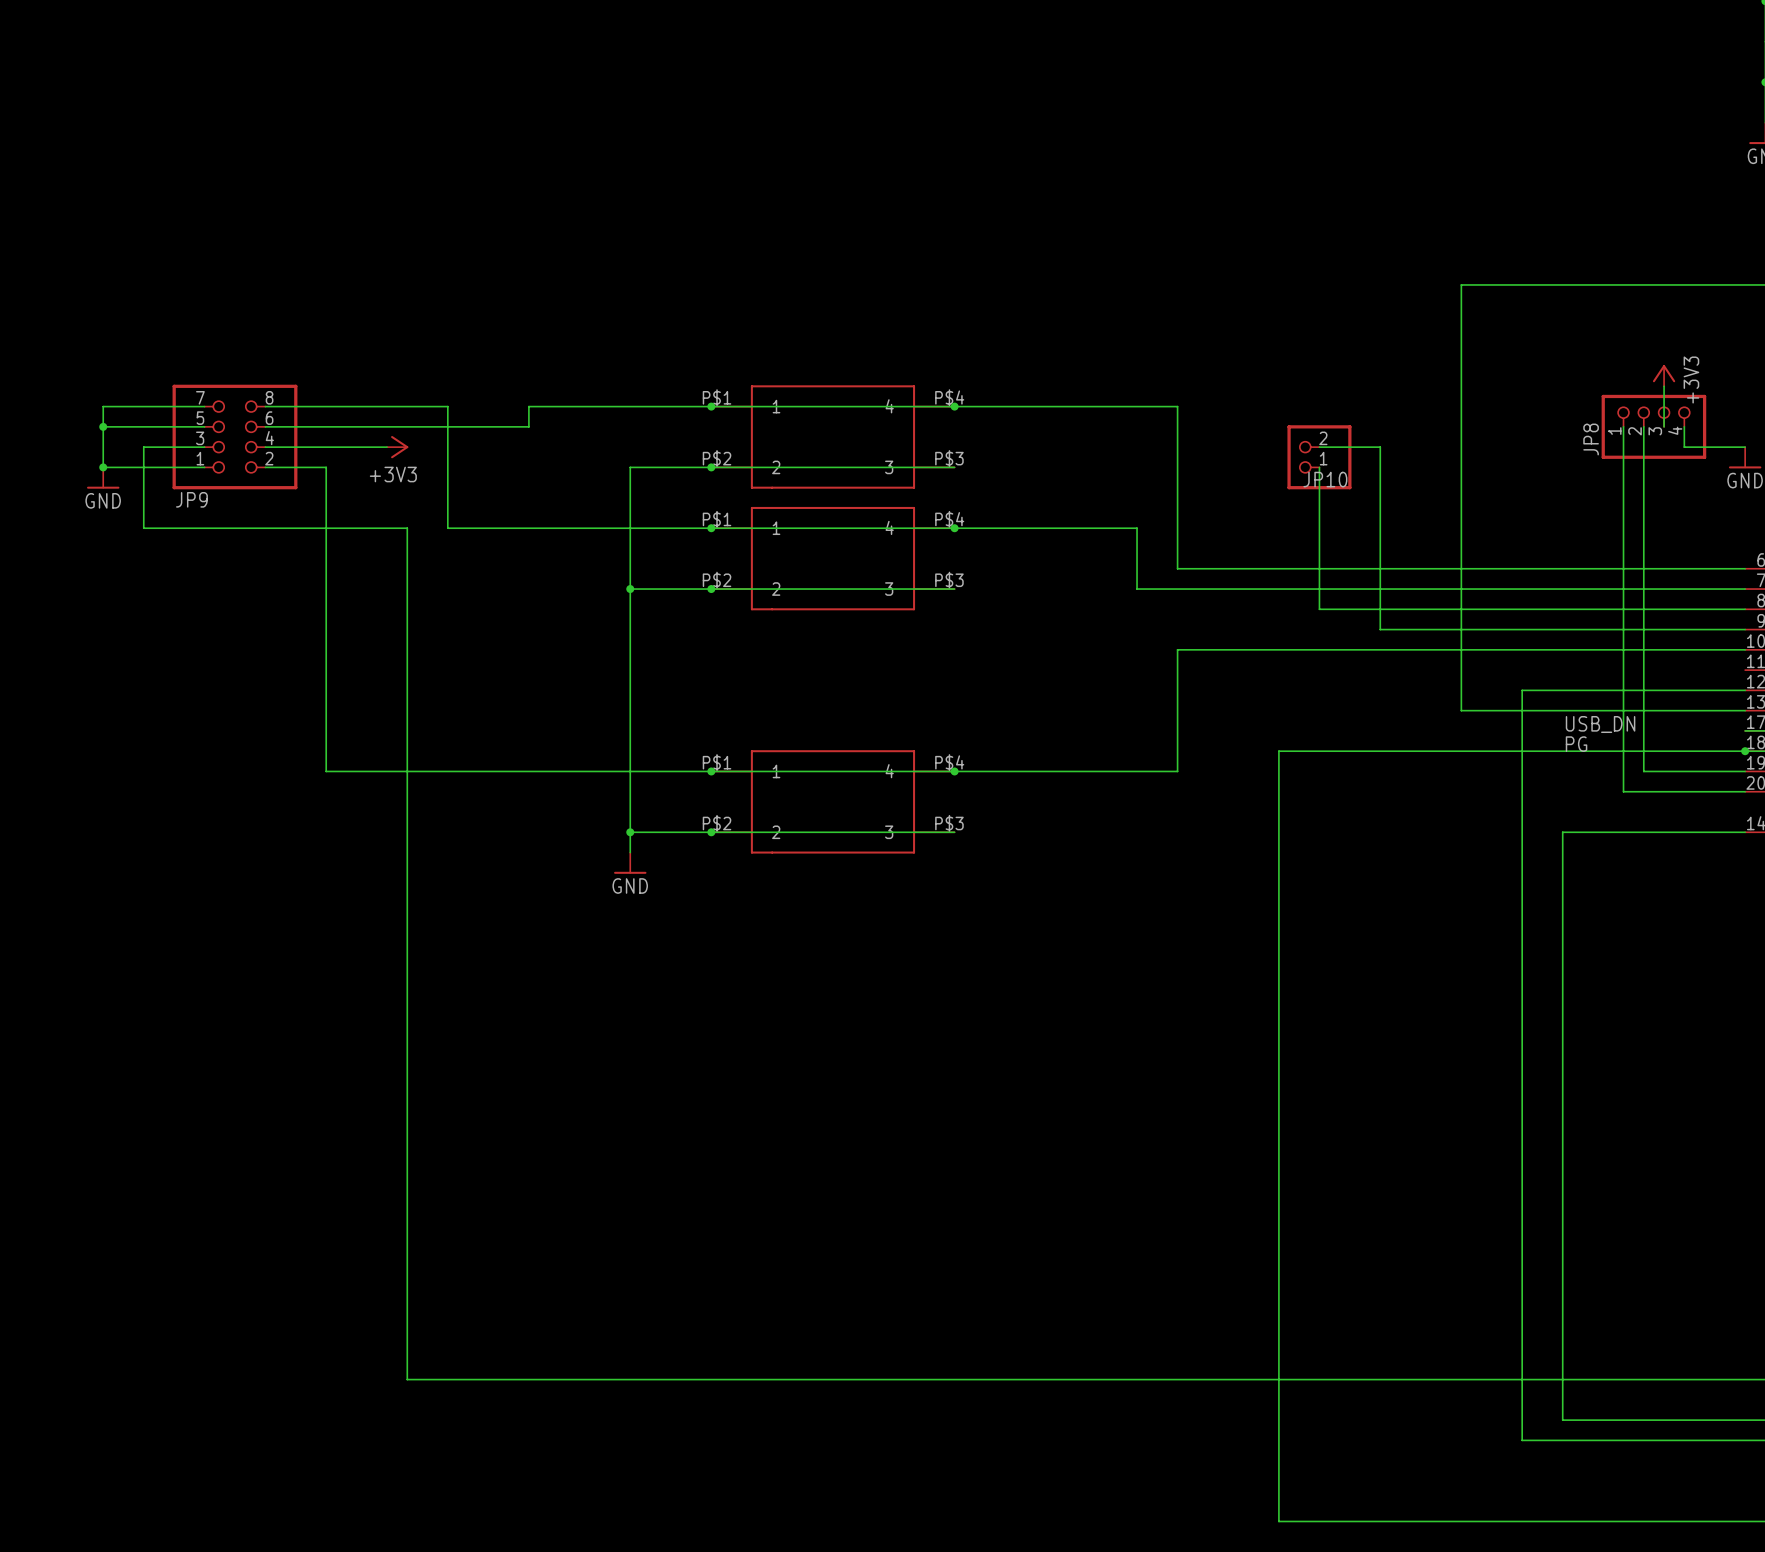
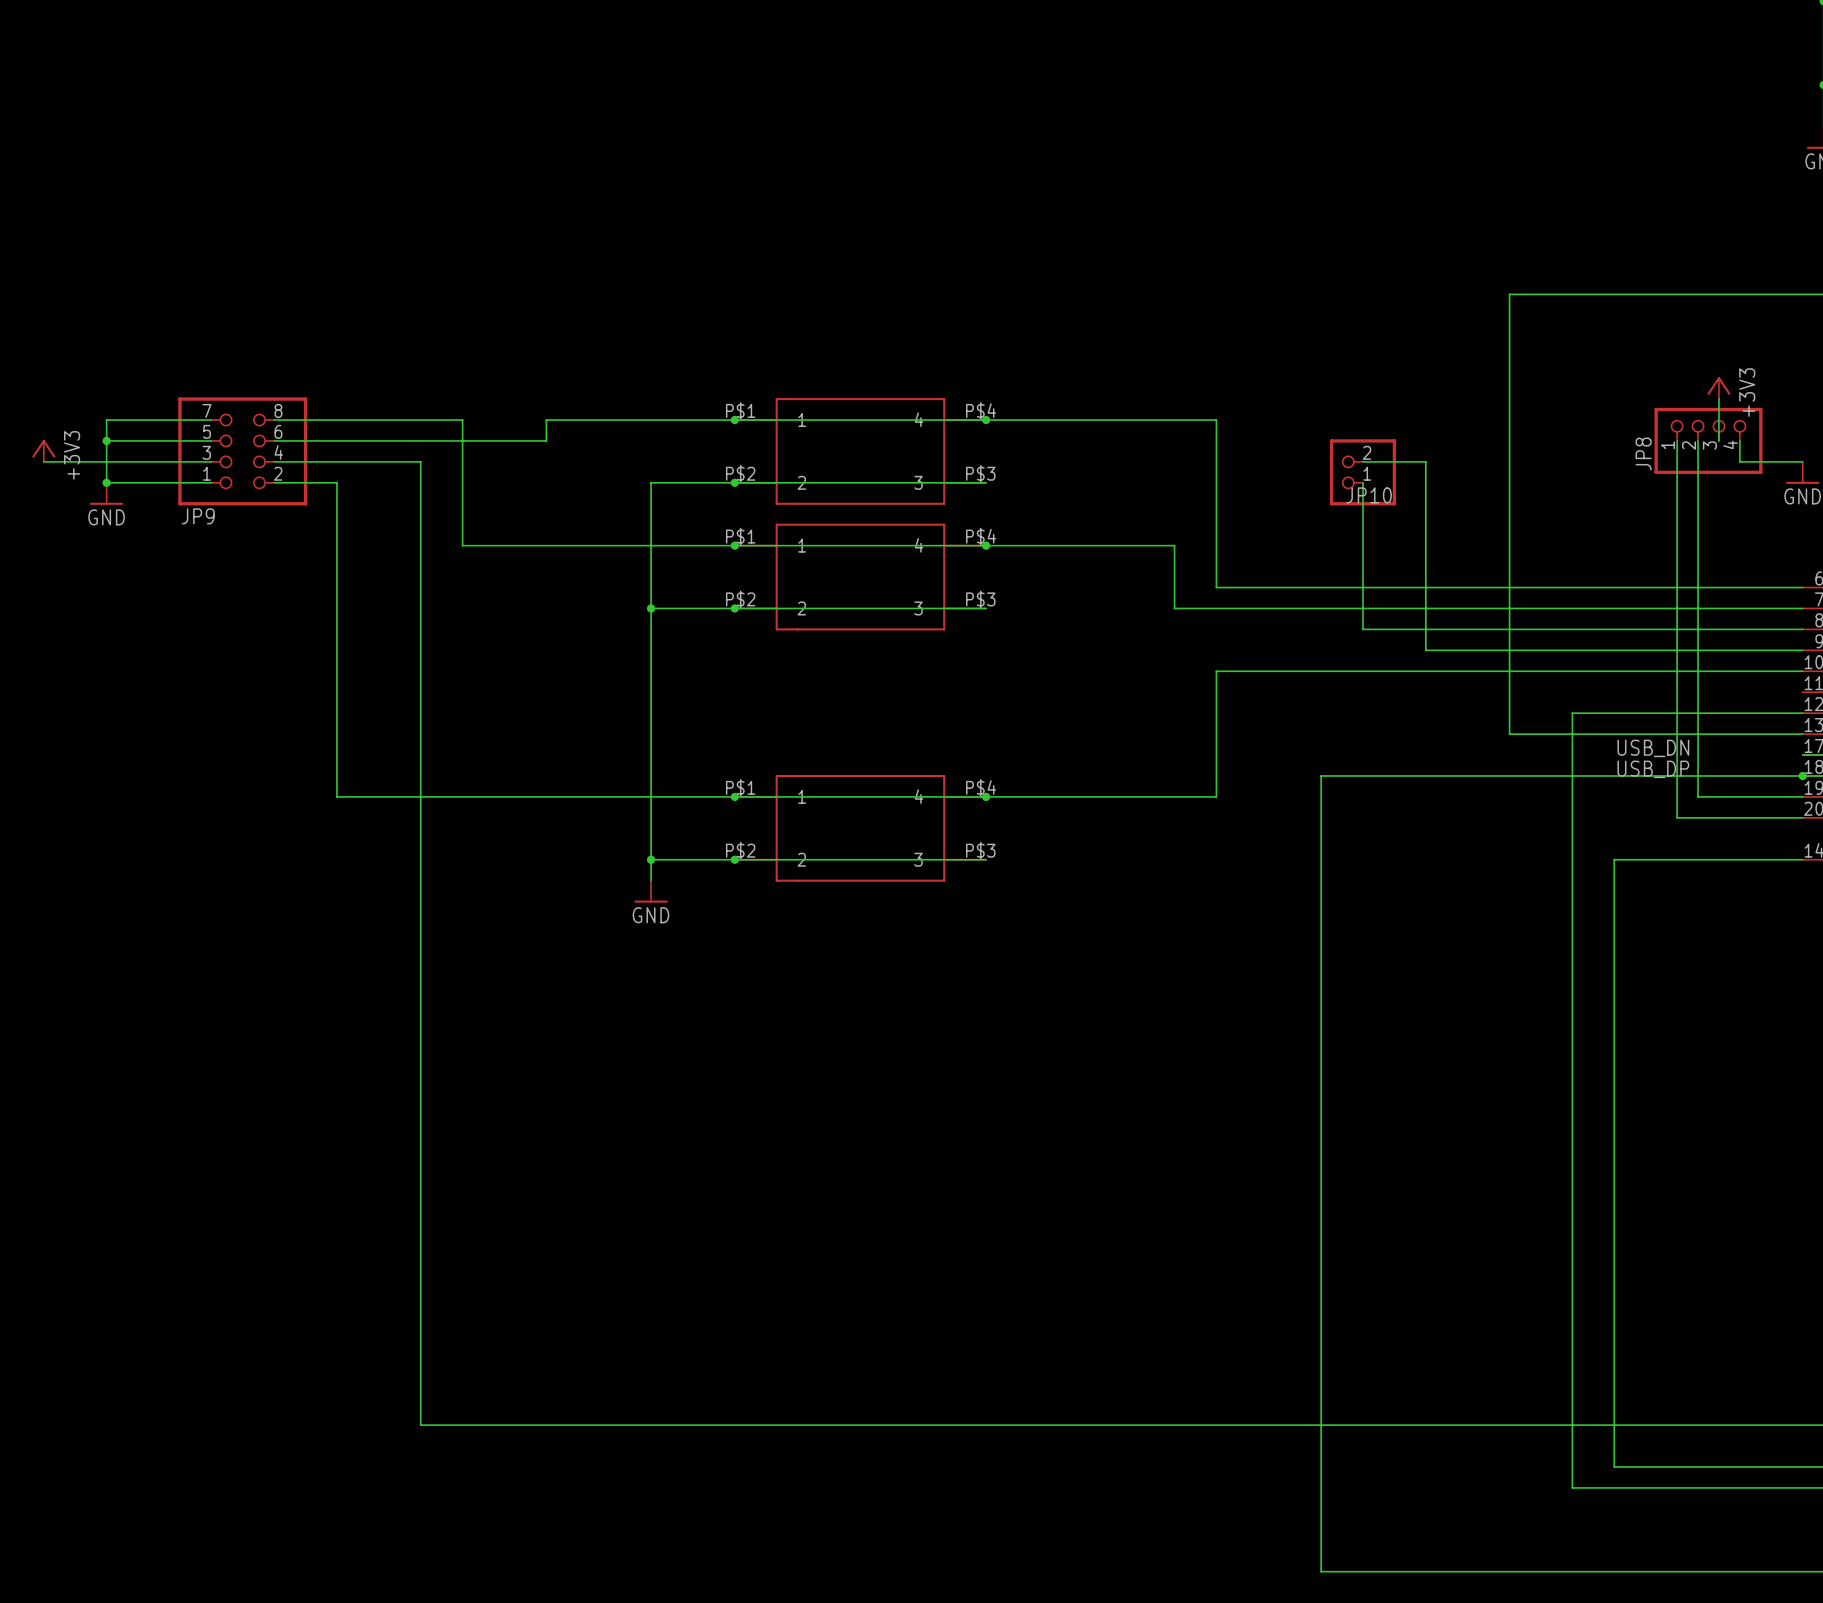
power symbol: none -> +3V3 (43, 450)
wire: none -> (43, 461) (148, 461)
wire: (143, 447) (143, 528) (407, 528) -> (399, 461) (420, 461) (420, 545)
power symbol: +3V3 (397, 447) -> none
label: PG (1576, 744) -> USB_DP (1653, 769)

